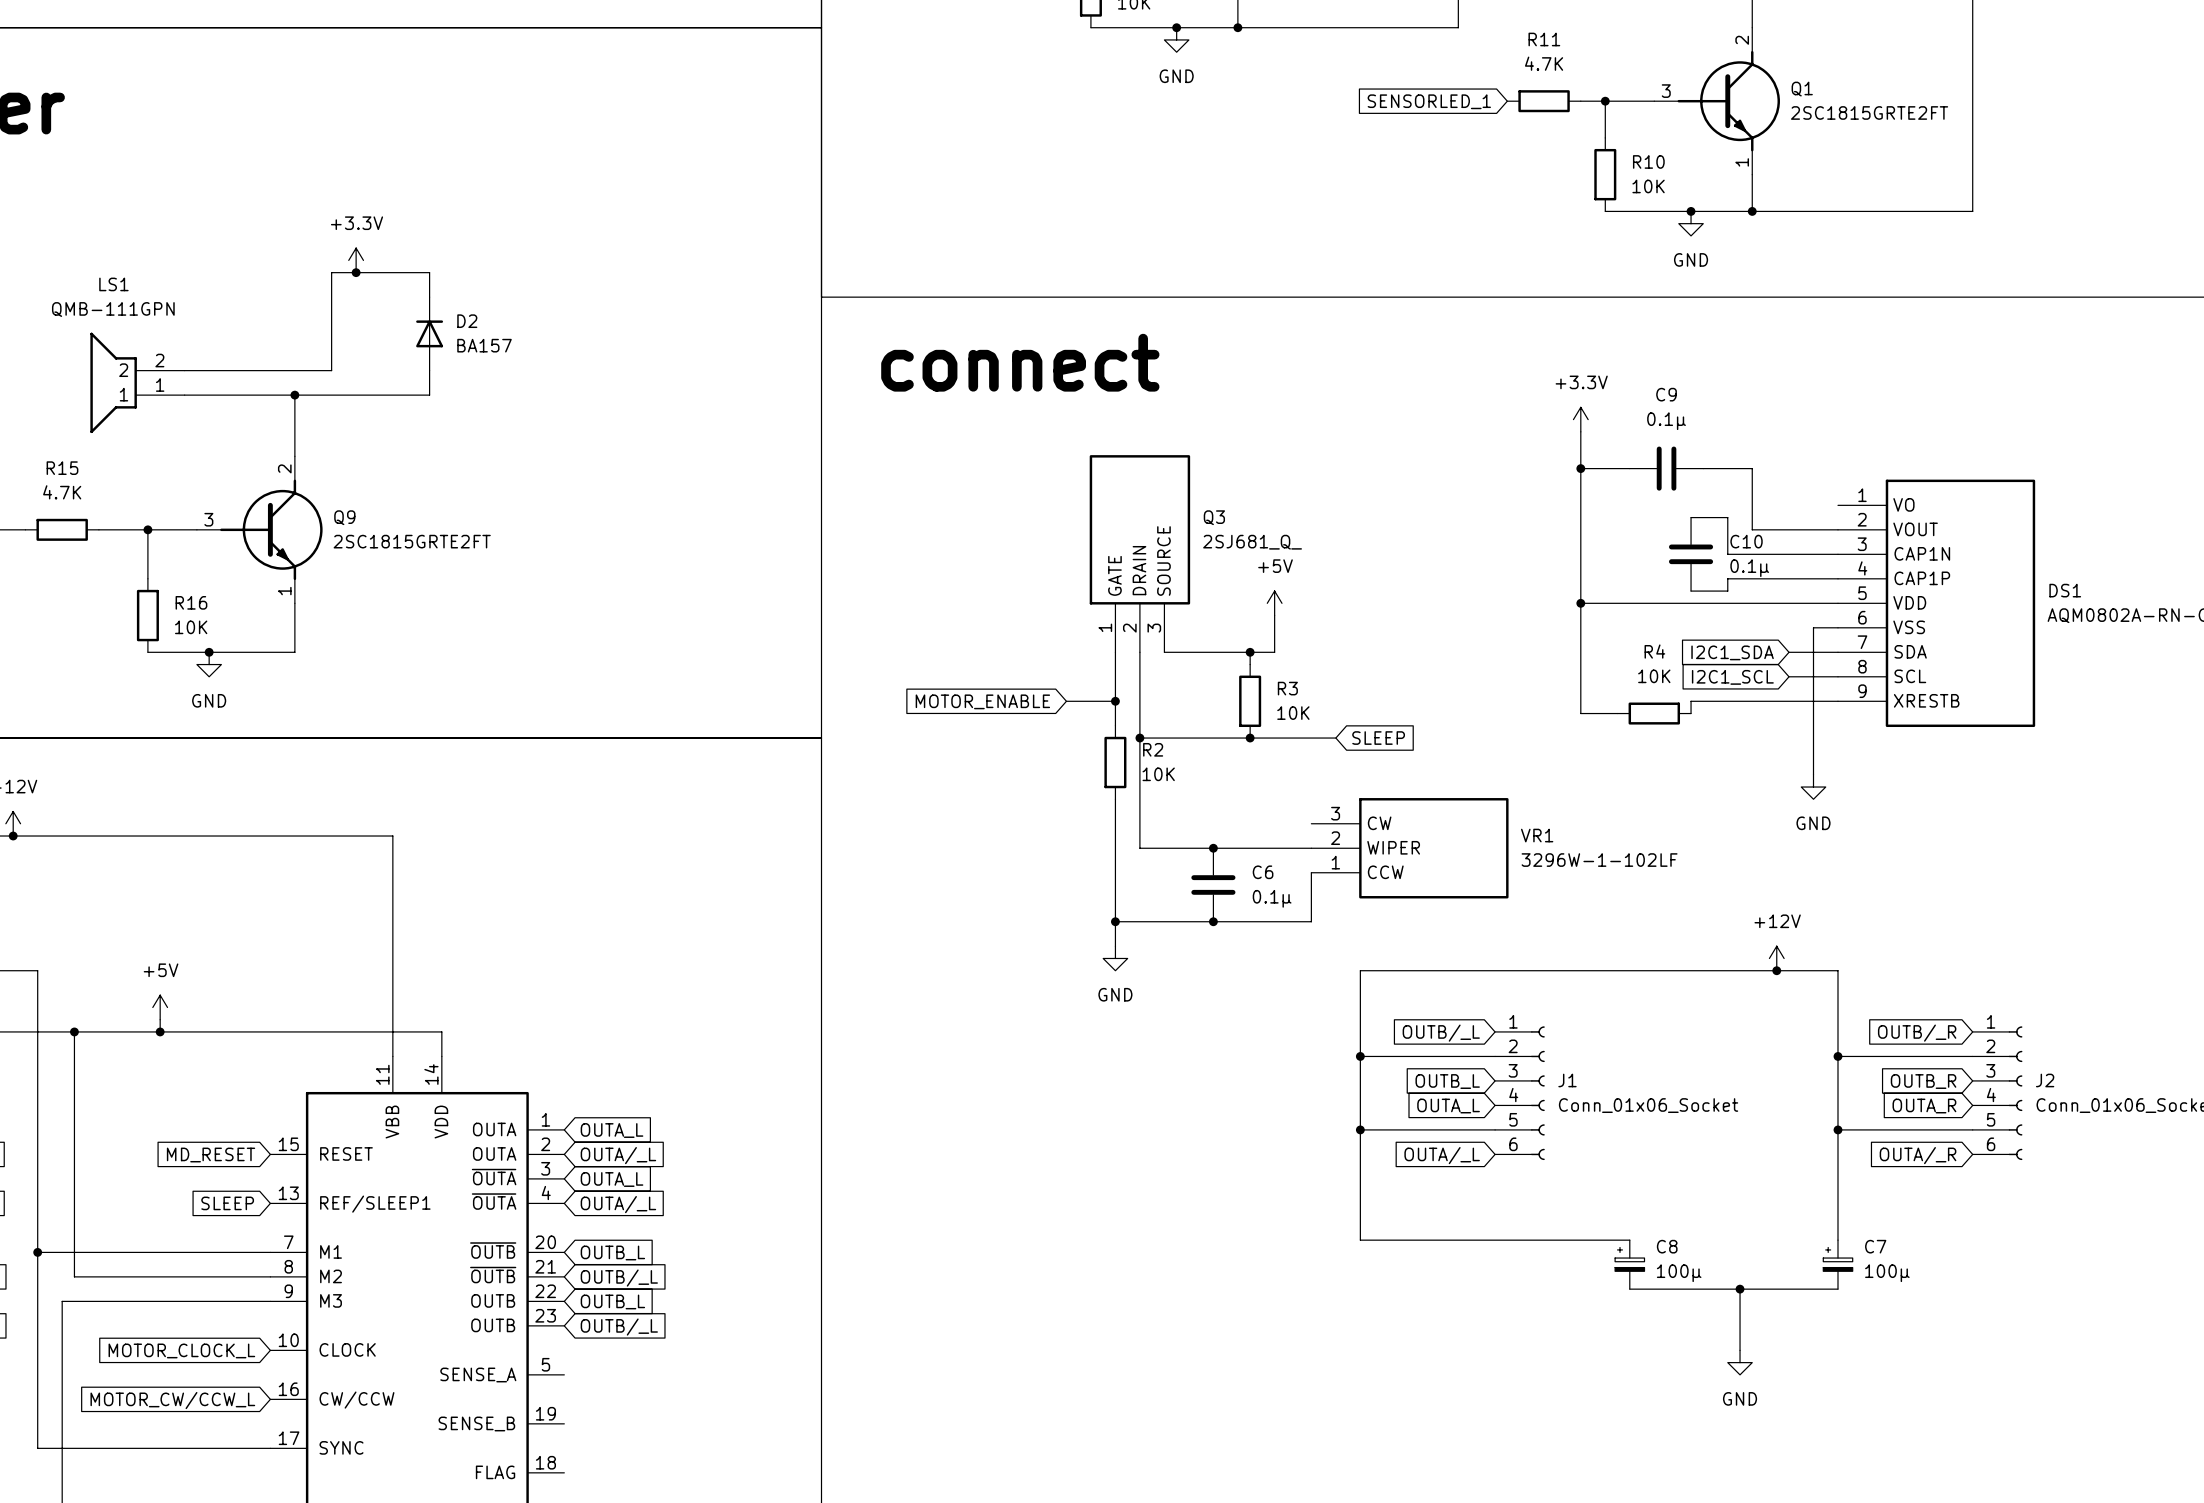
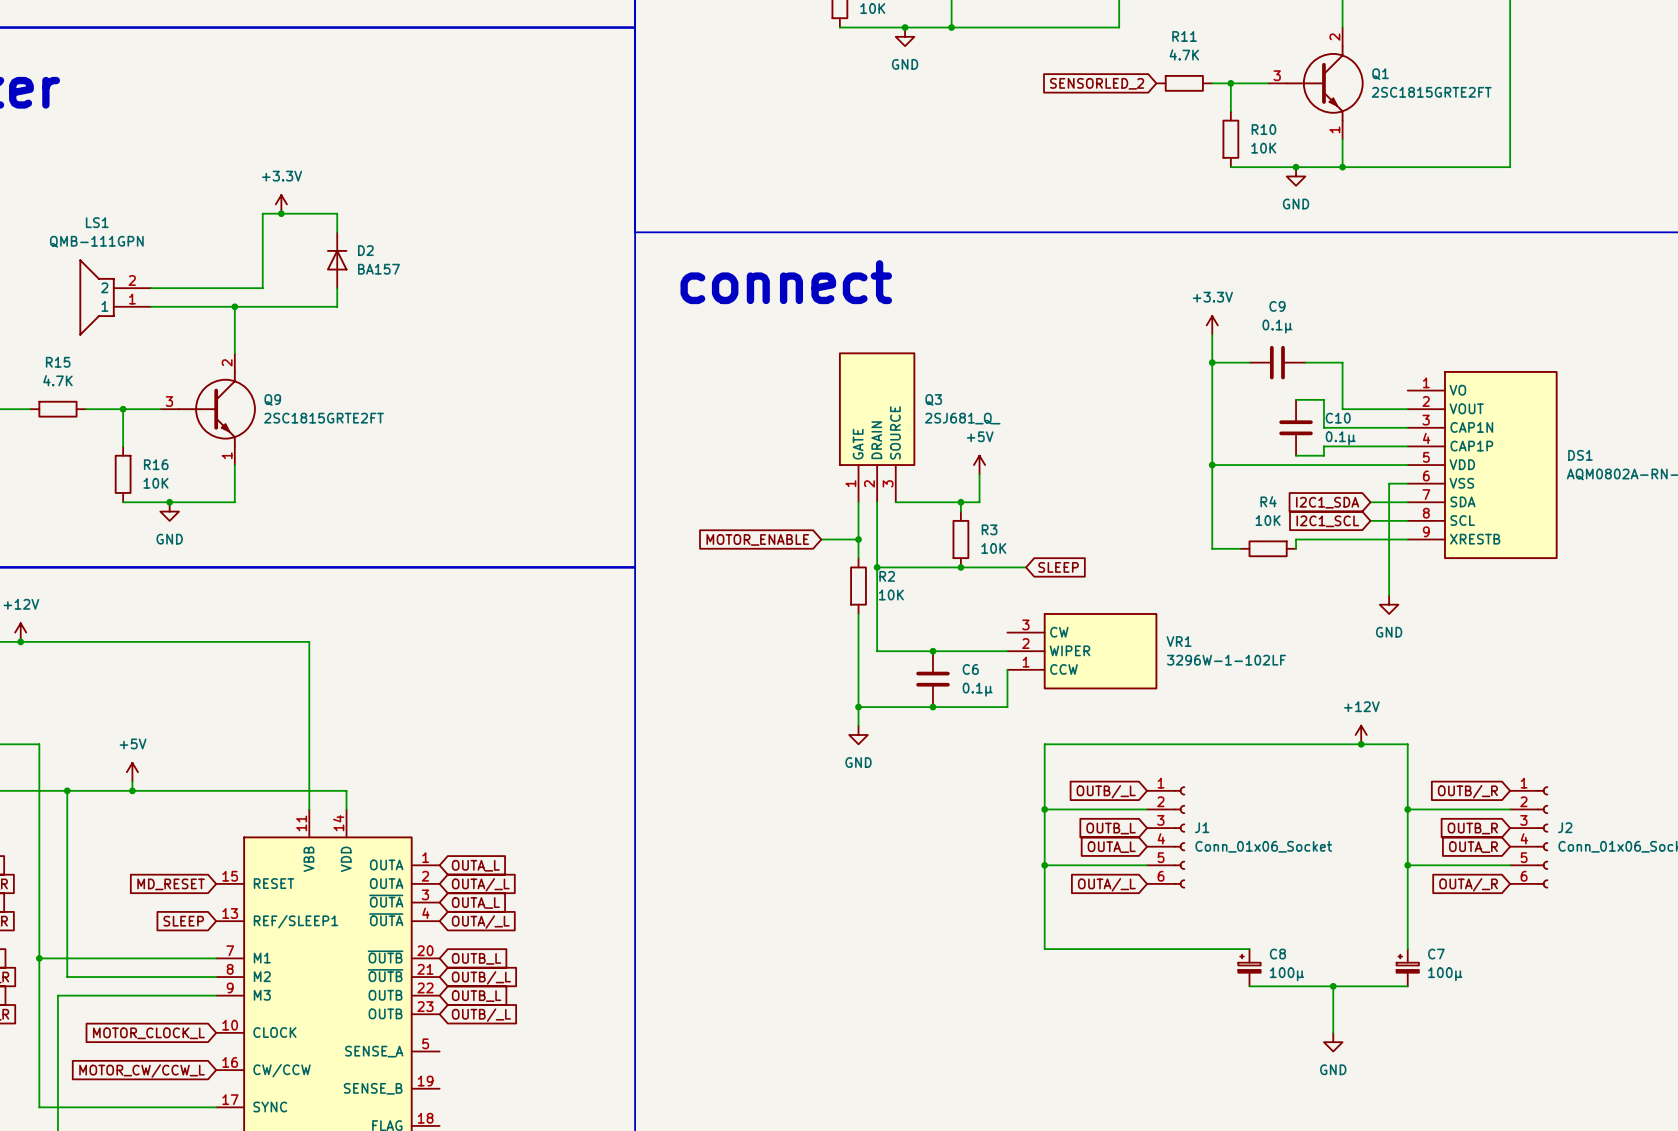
global label: SENSORLED_1 (1429, 101) -> SENSORLED_2 (1097, 83)

